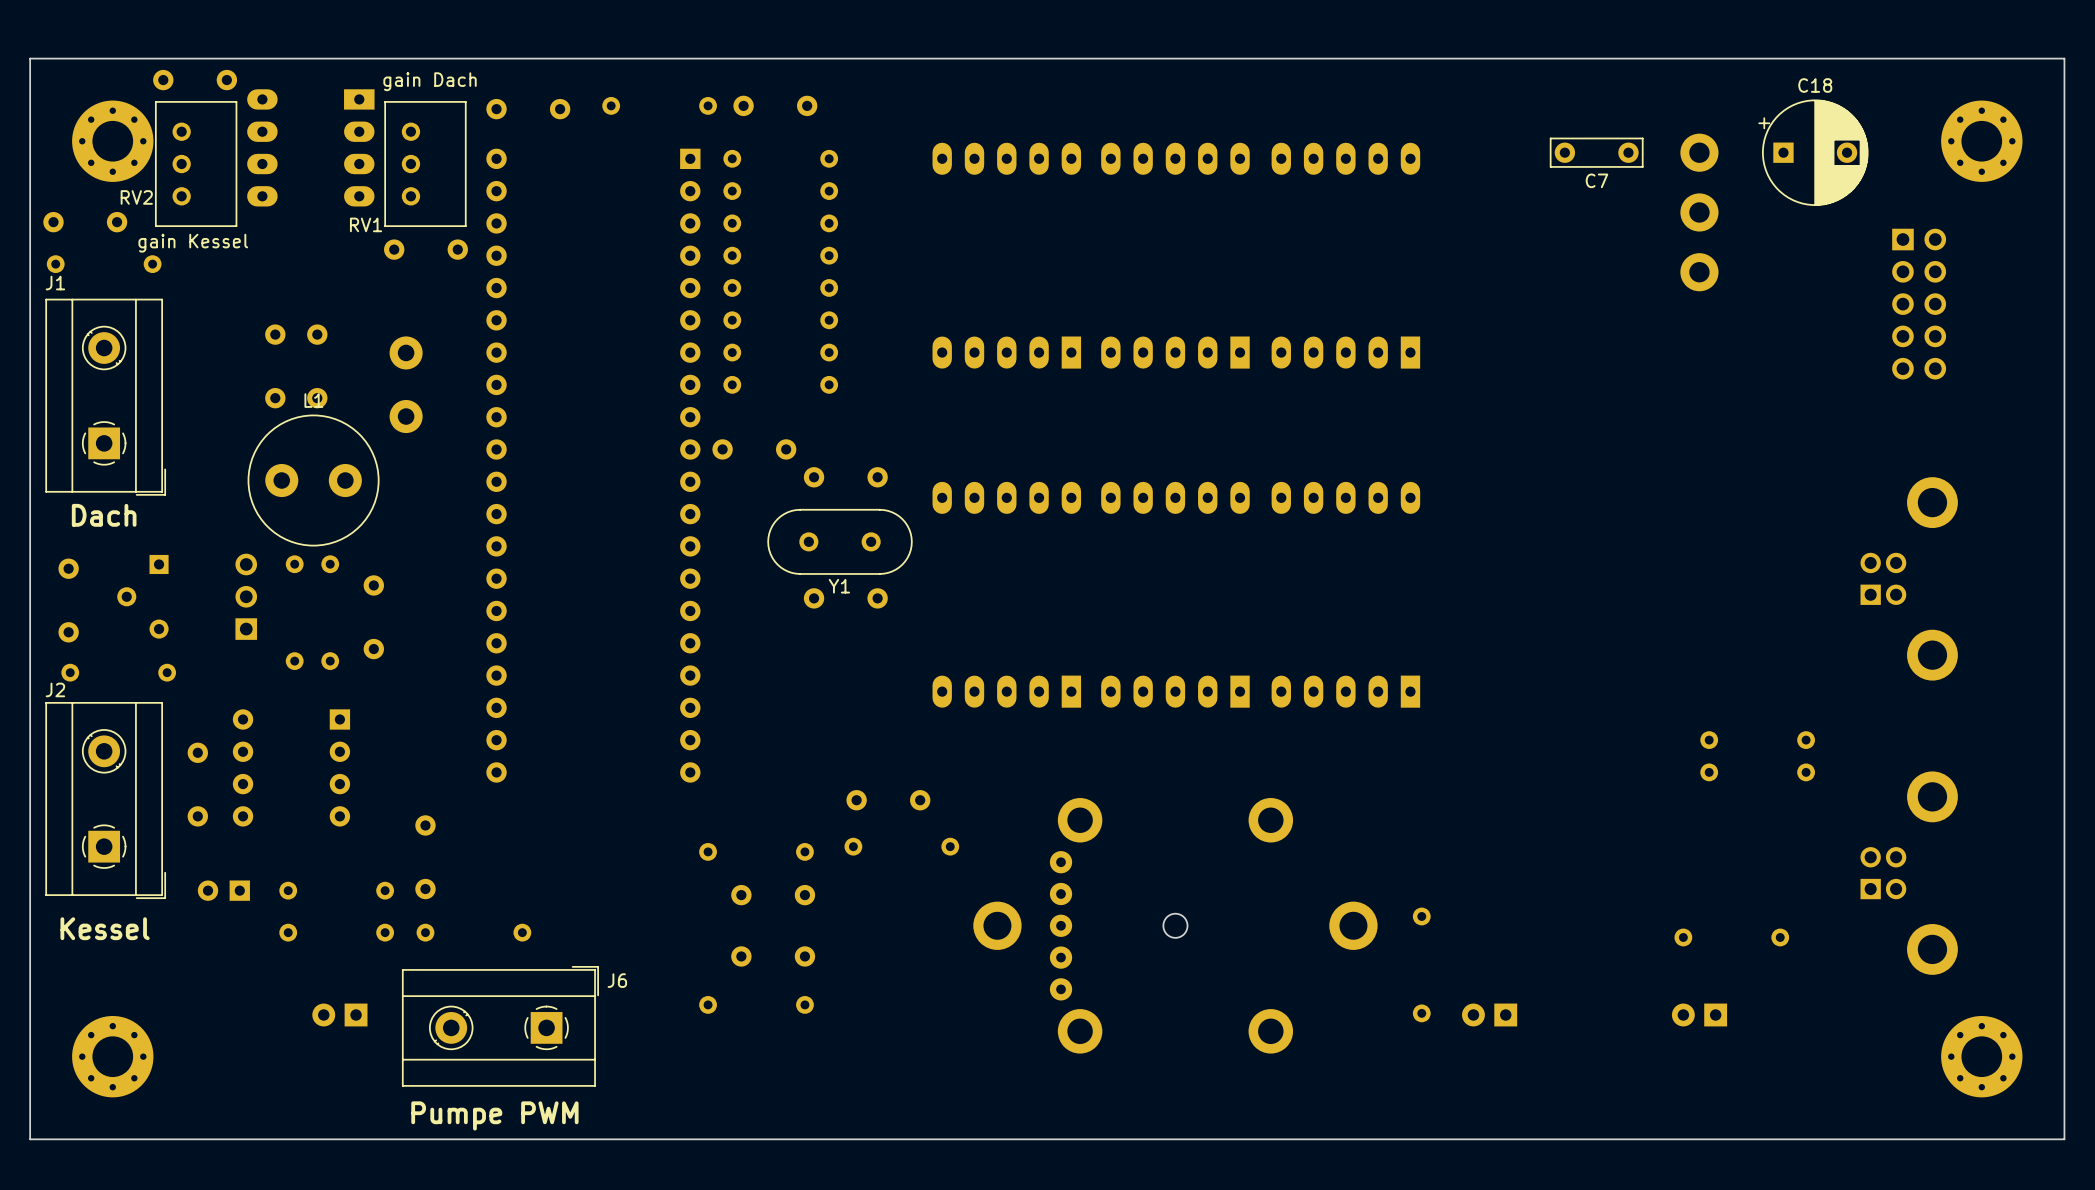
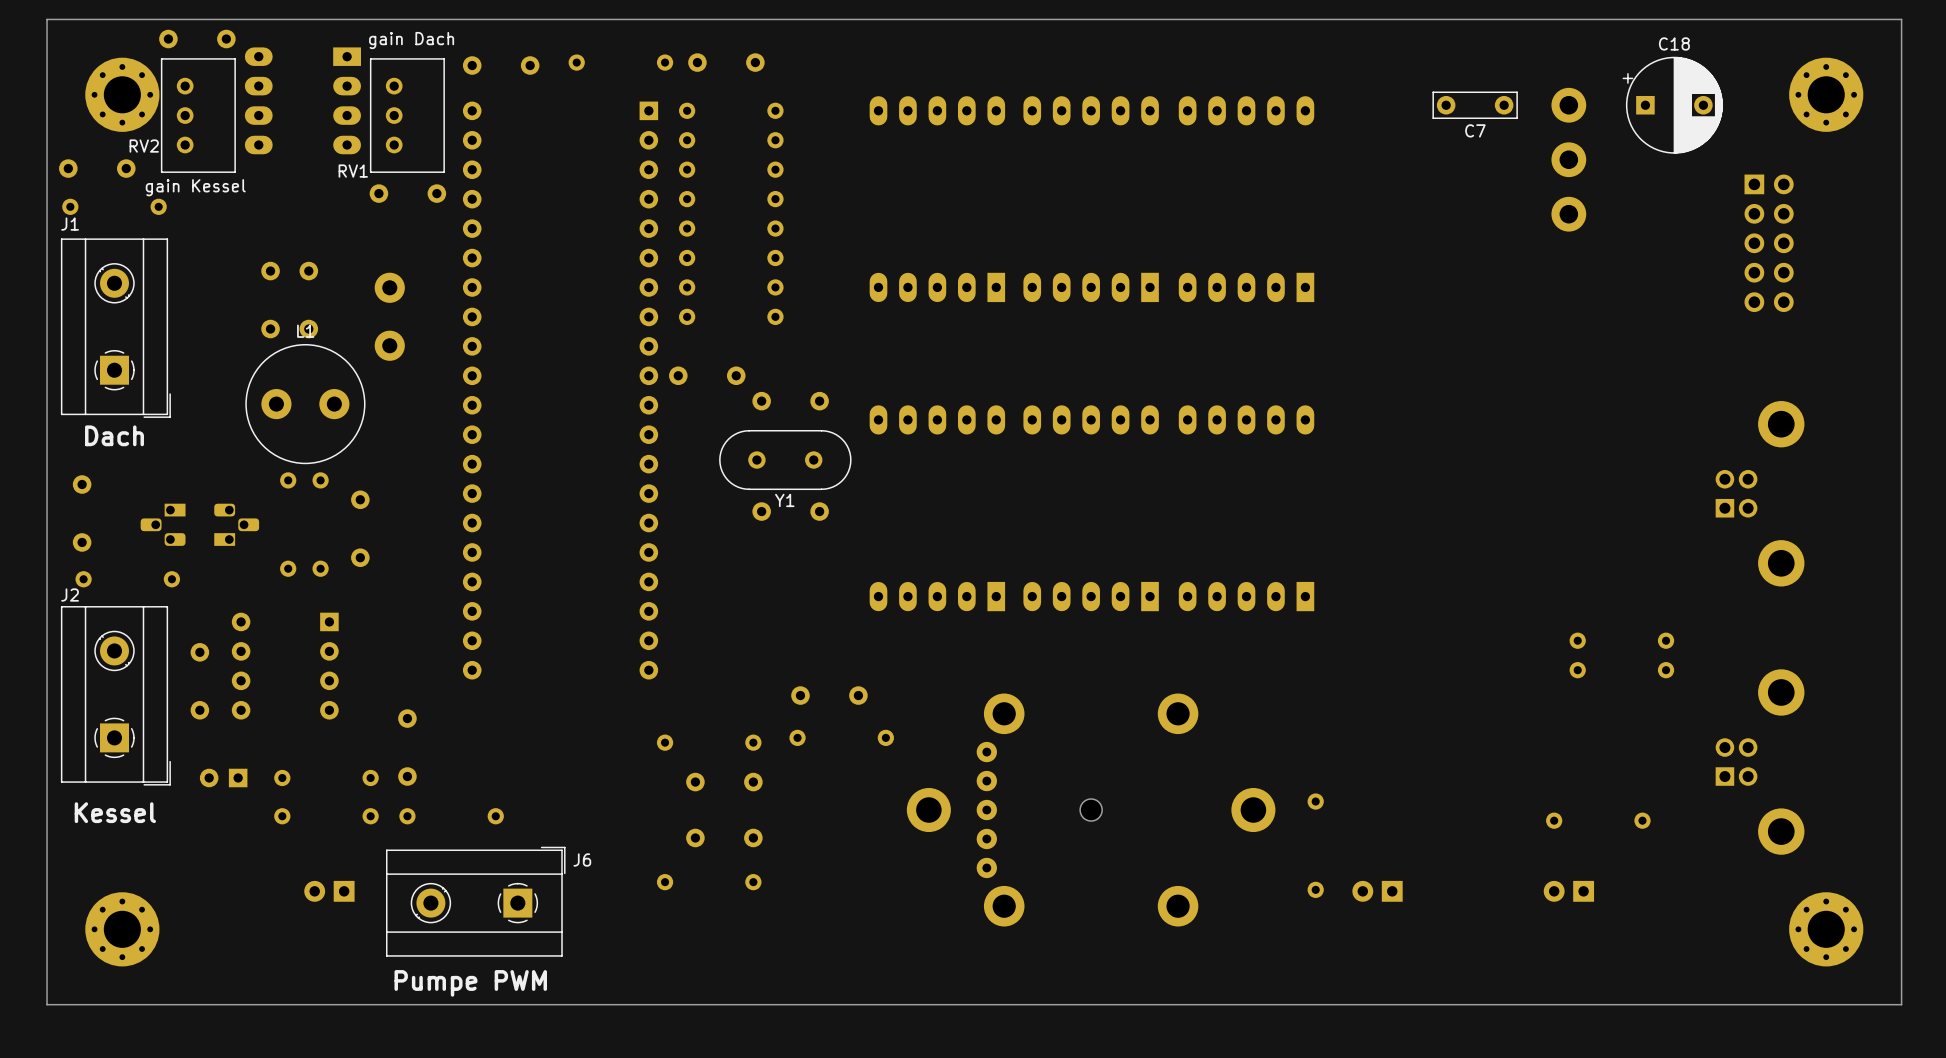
part: (142, 596) -> none
part: (246, 596) -> none
part: none -> (163, 524)
part: none -> (236, 524)

